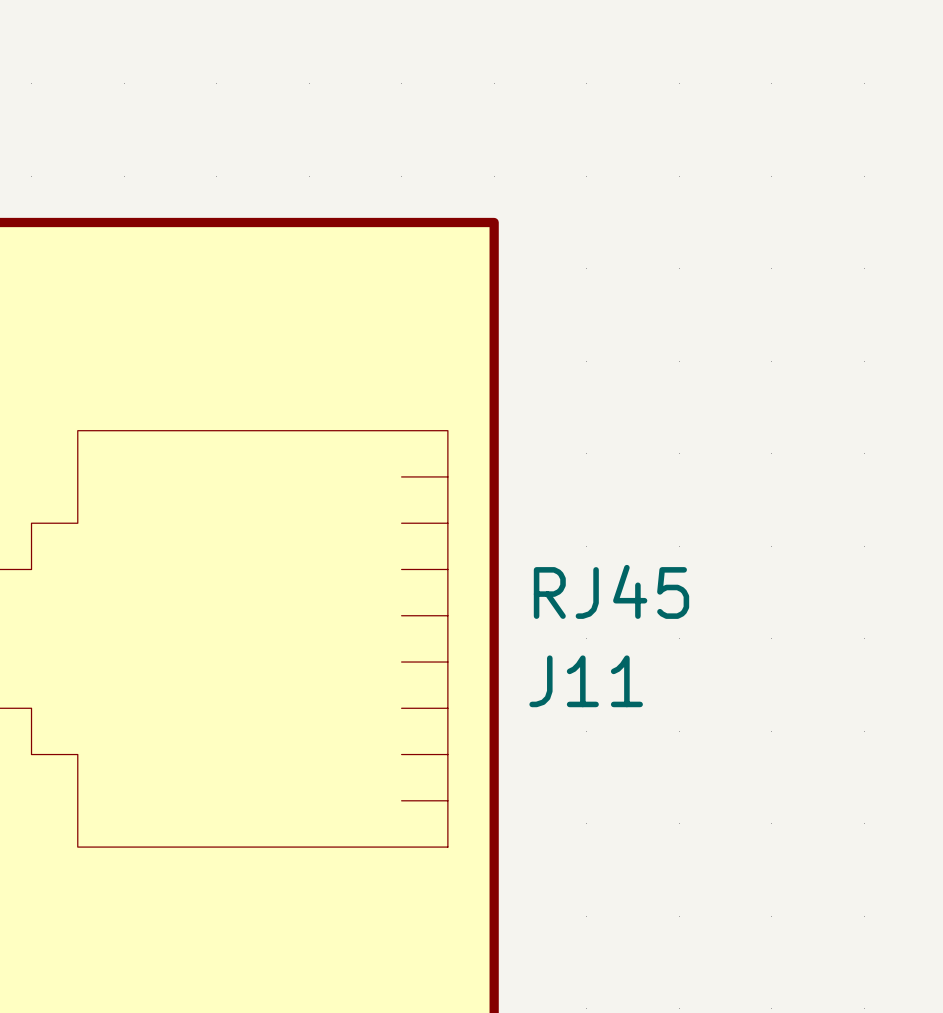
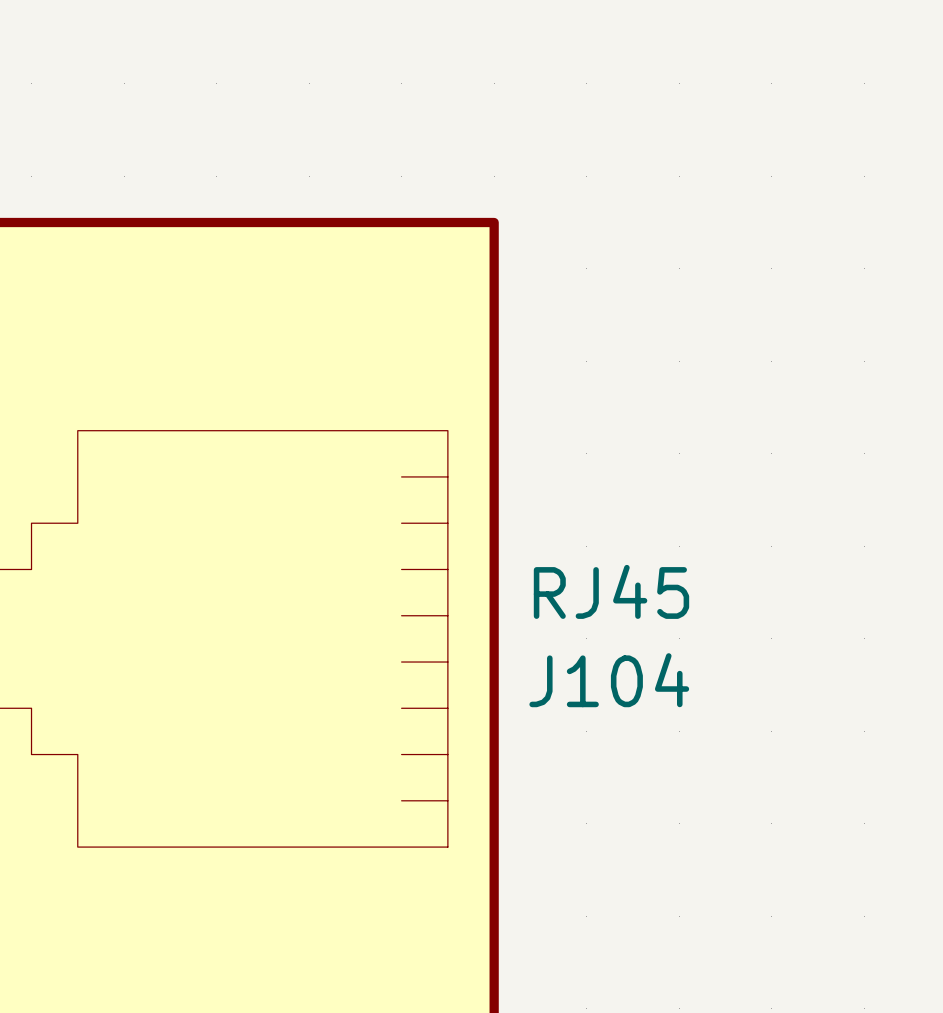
J11 name: J11 (586, 681) -> J104 (609, 680)

